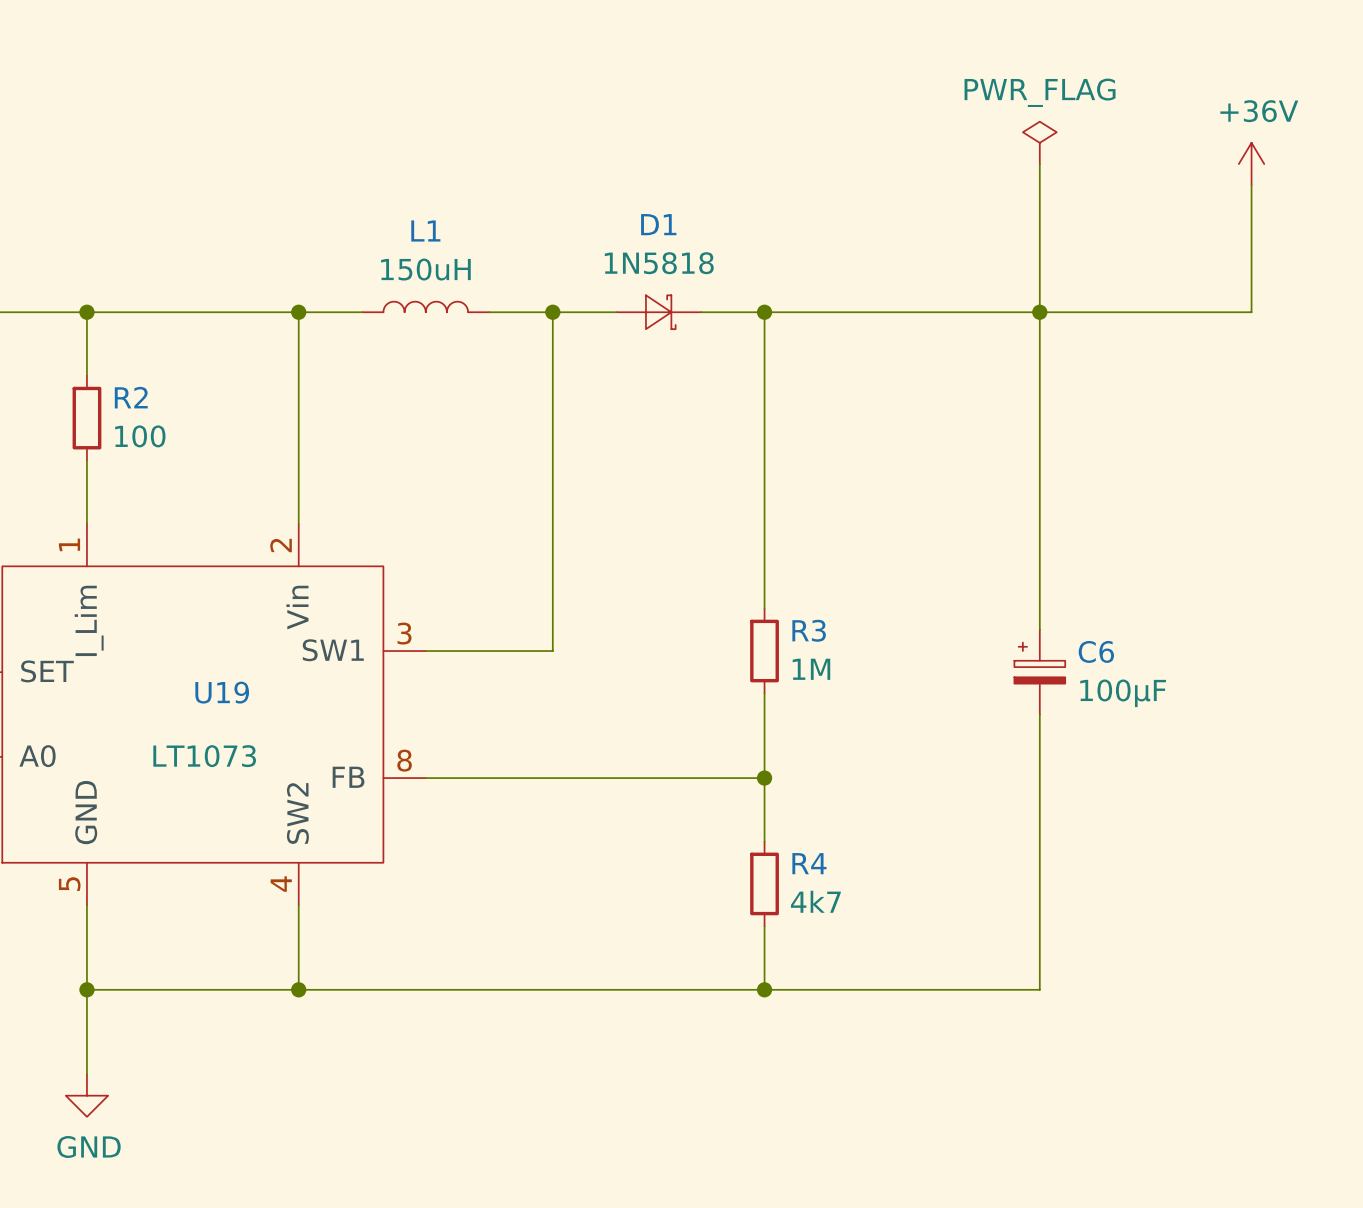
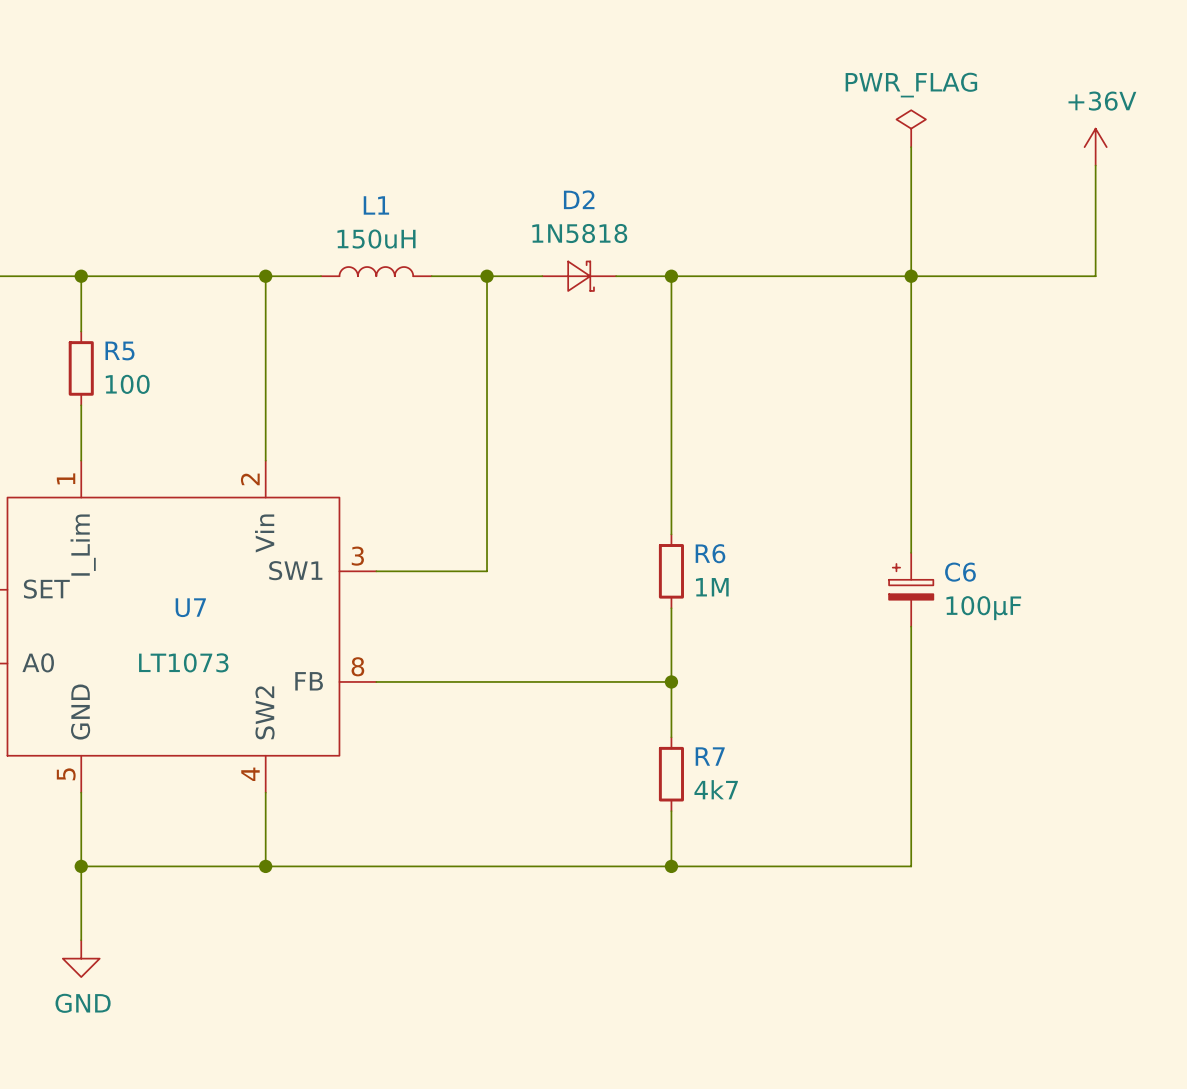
D1 name: D1 (658, 224) -> D2 (579, 199)
R2 name: R2 (131, 397) -> R5 (119, 350)
R3 name: R3 (809, 630) -> R6 (710, 553)
U19 name: U19 (222, 692) -> U7 (190, 607)
R4 name: R4 (809, 863) -> R7 (710, 756)

